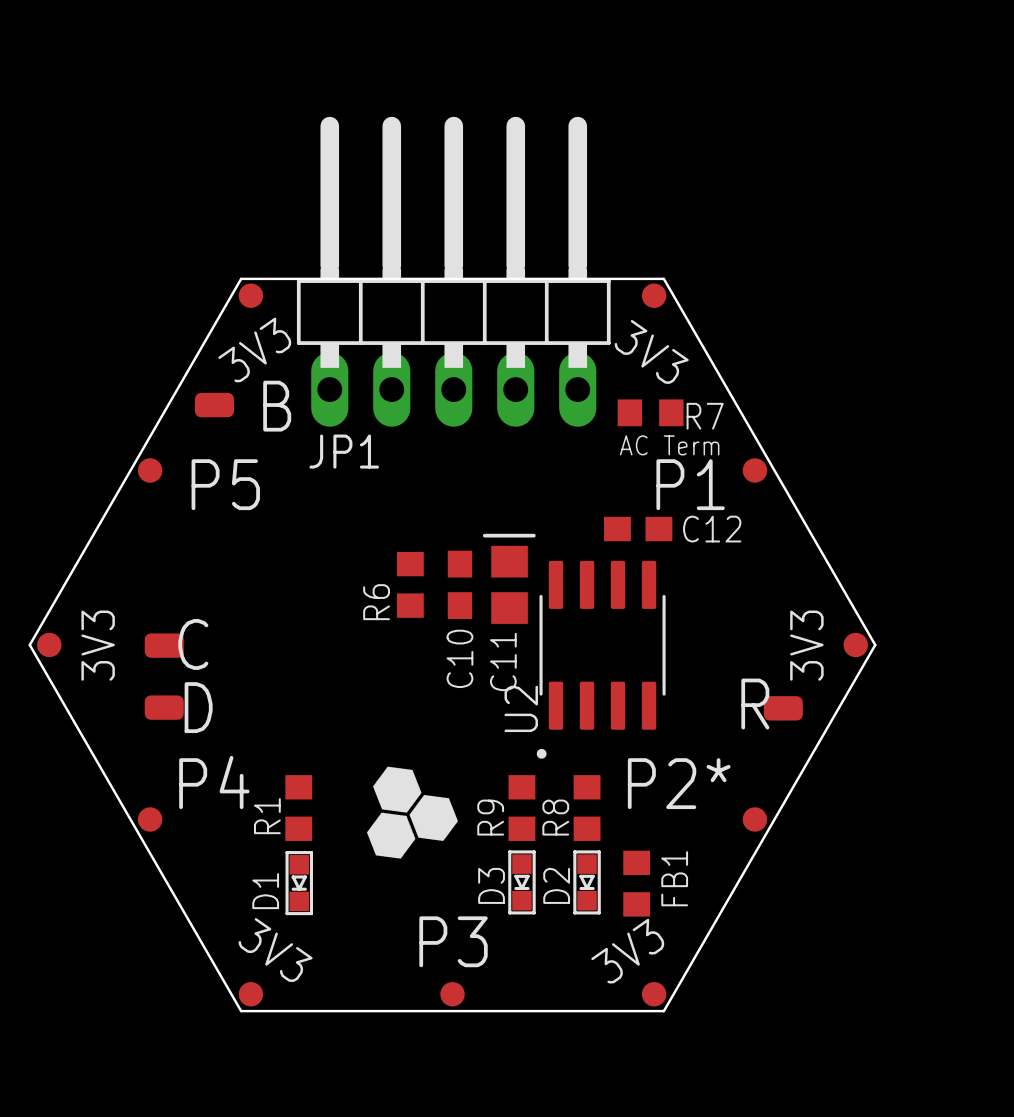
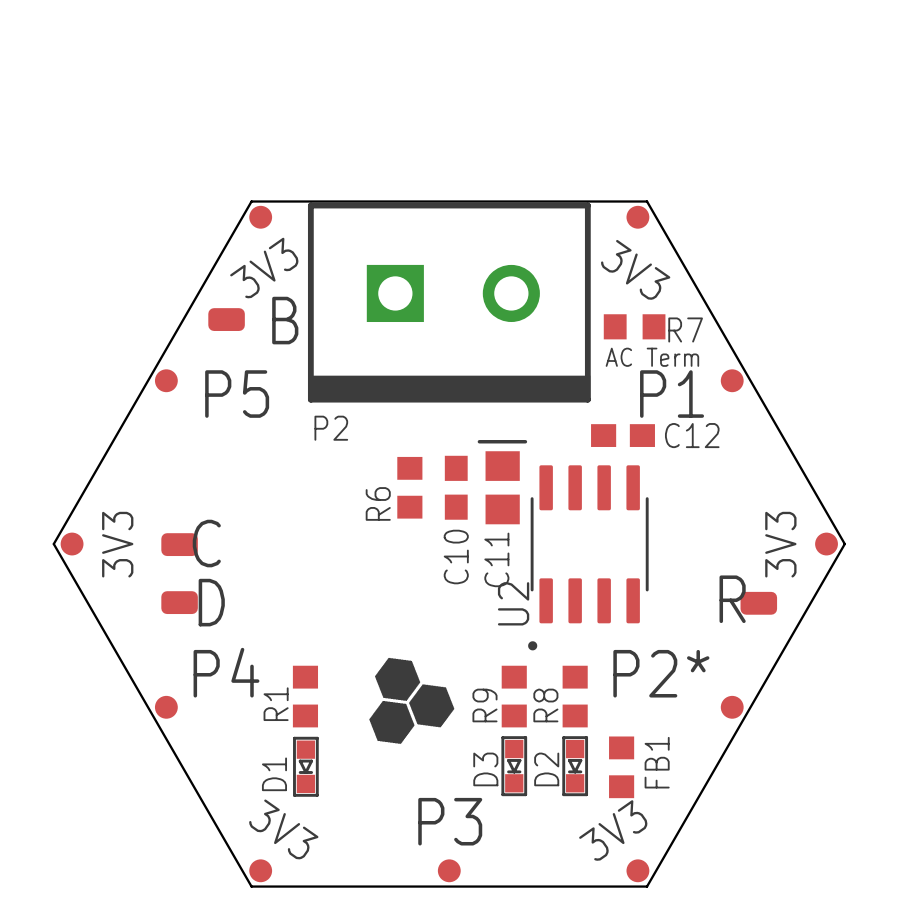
JP1: (453, 271) -> none
P2: none -> (449, 302)

